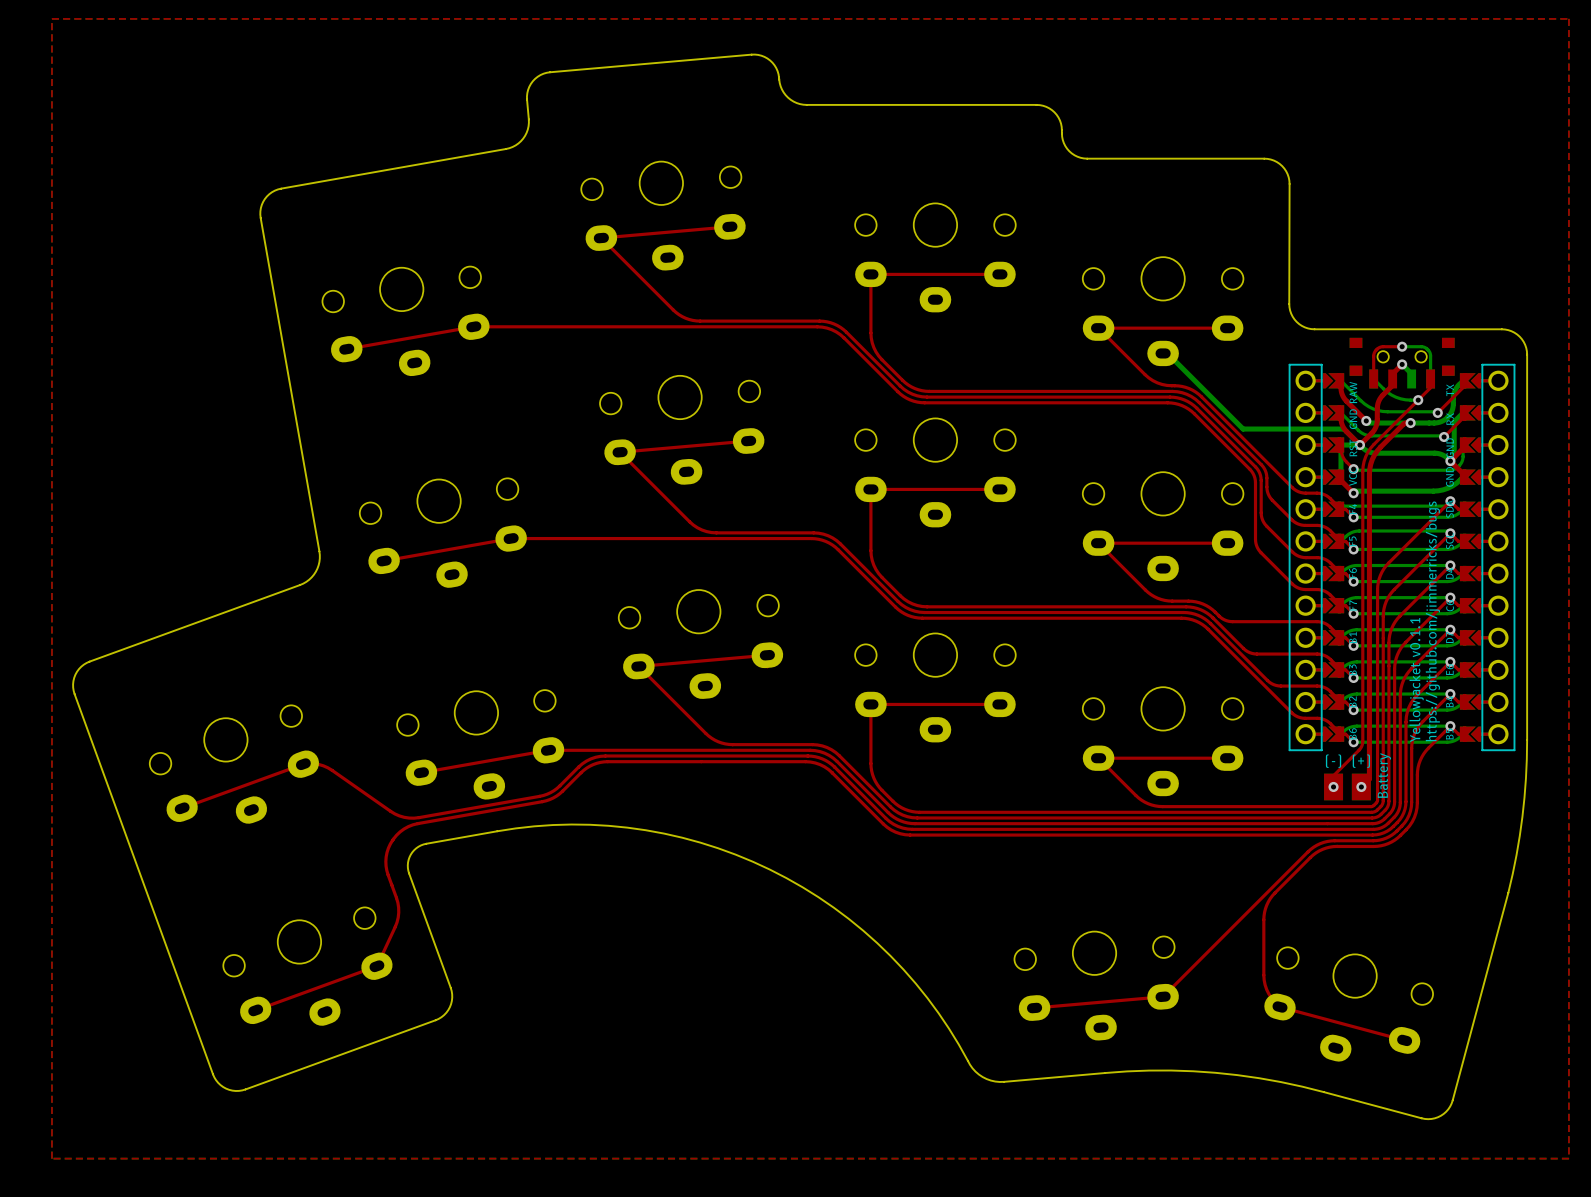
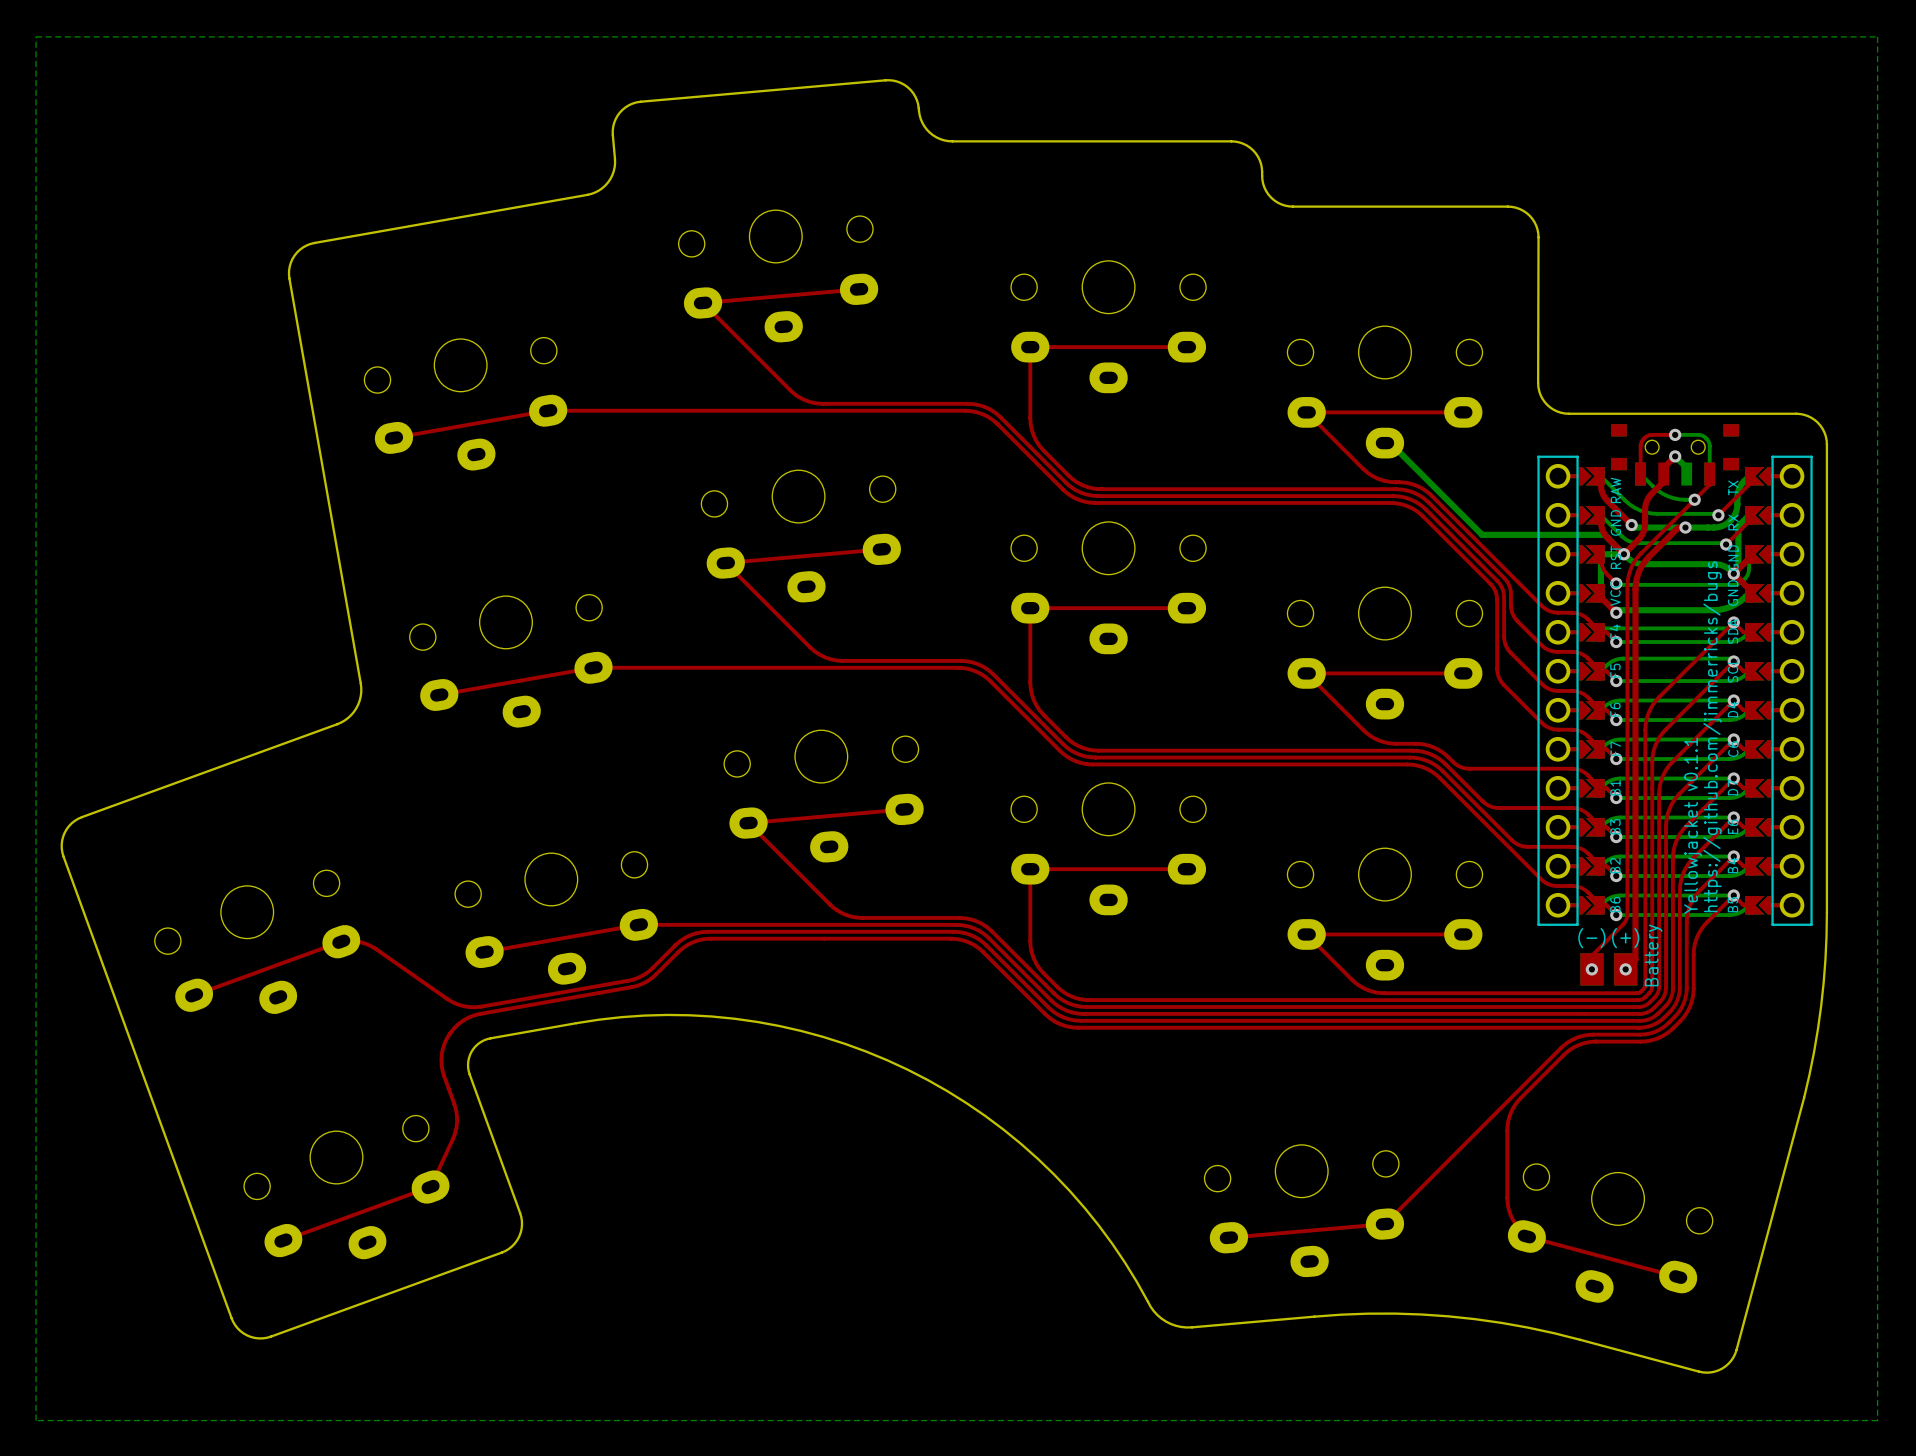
top zone outline: (51, 18) (51, 1158) (1568, 1158) (1568, 18) (51, 18) -> none

